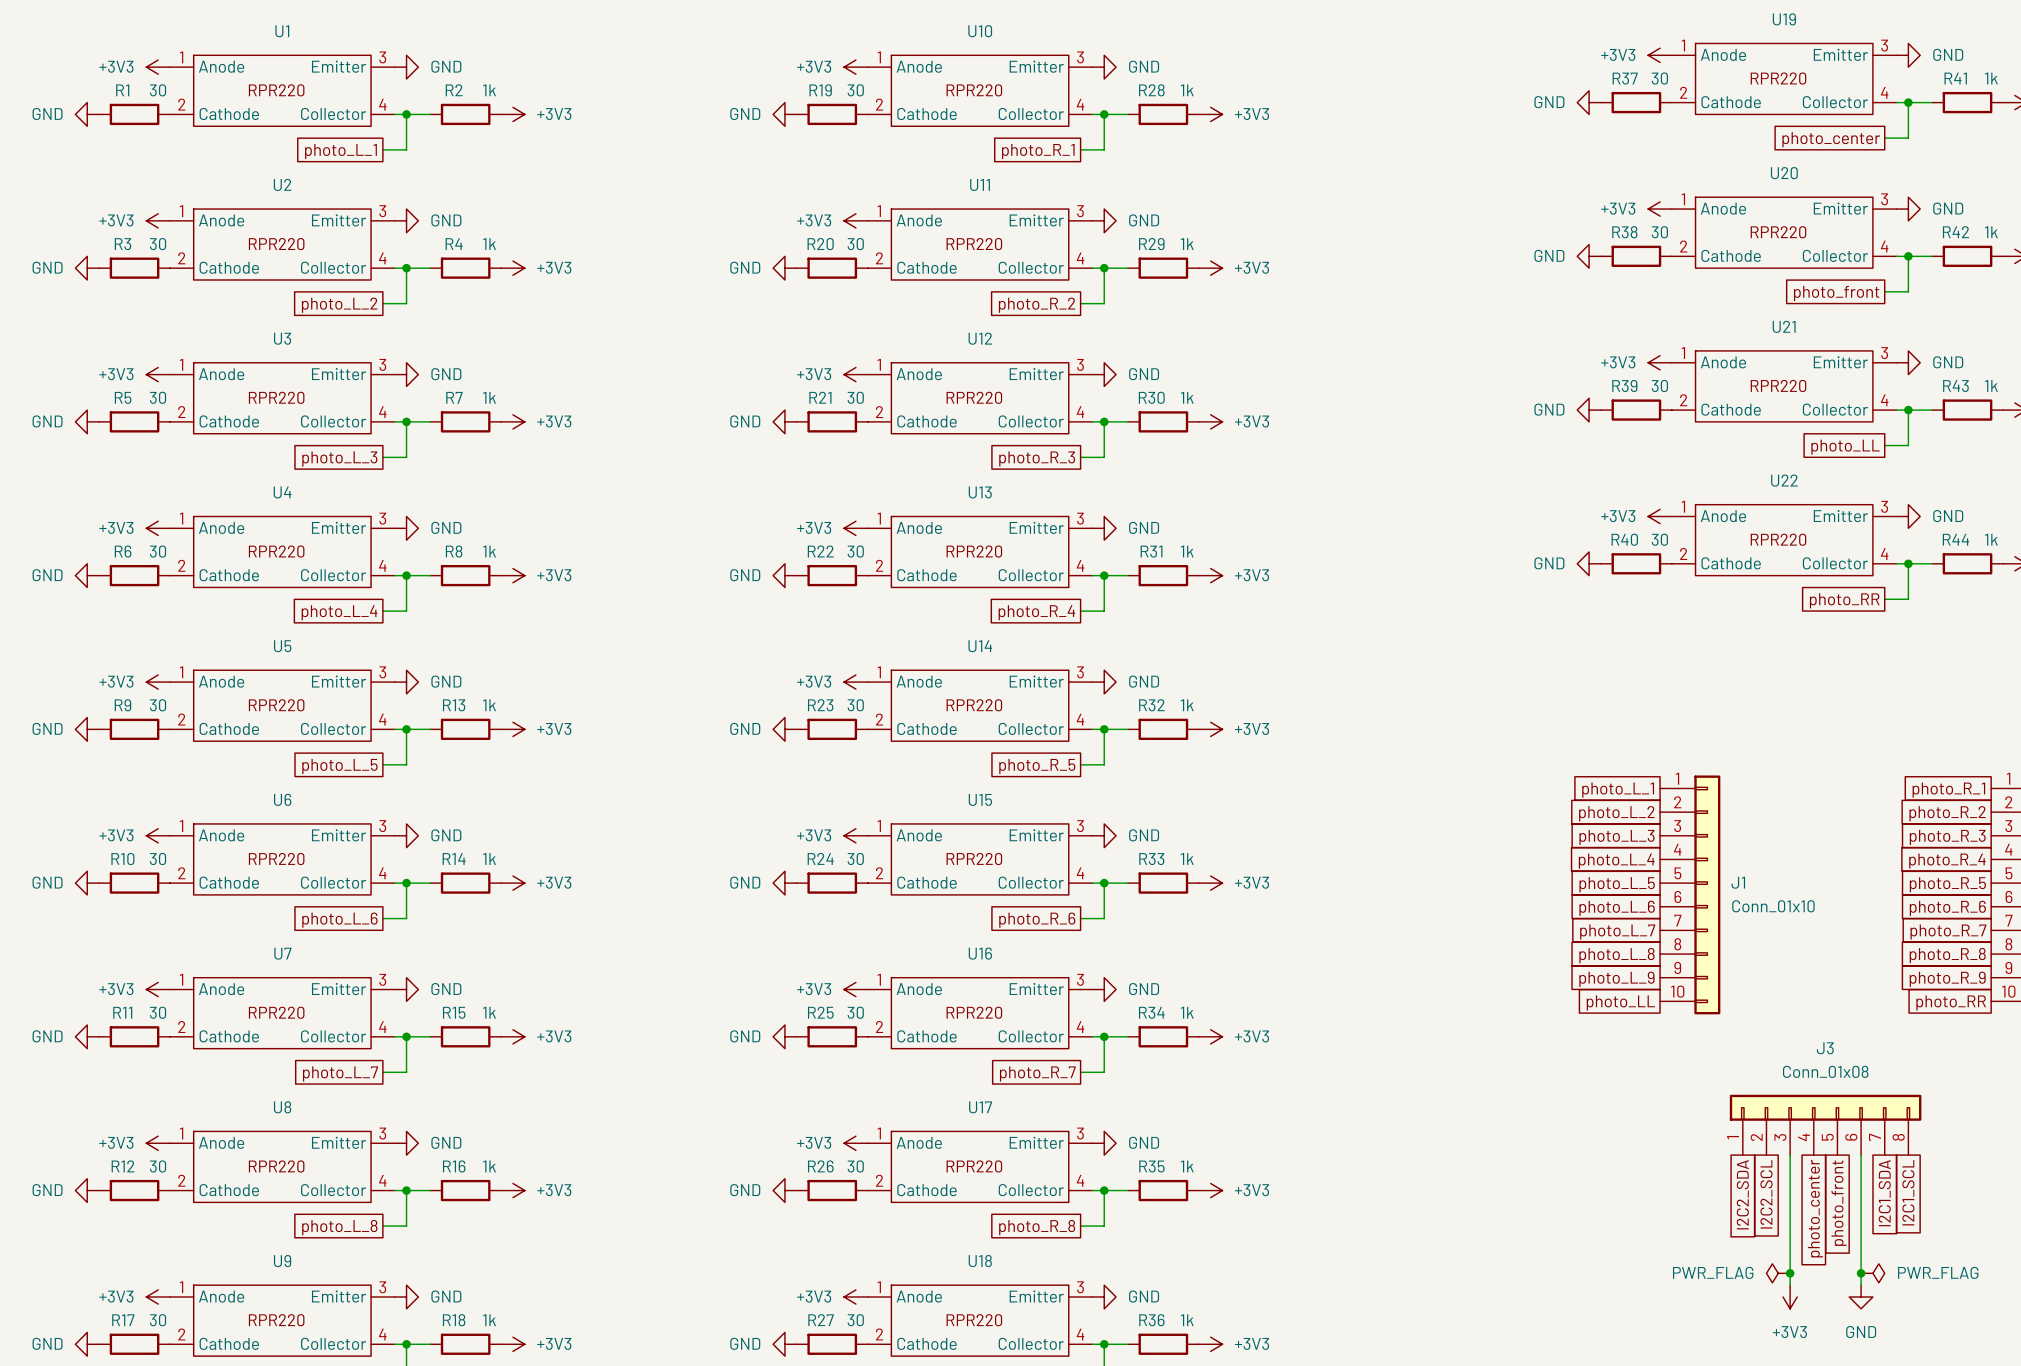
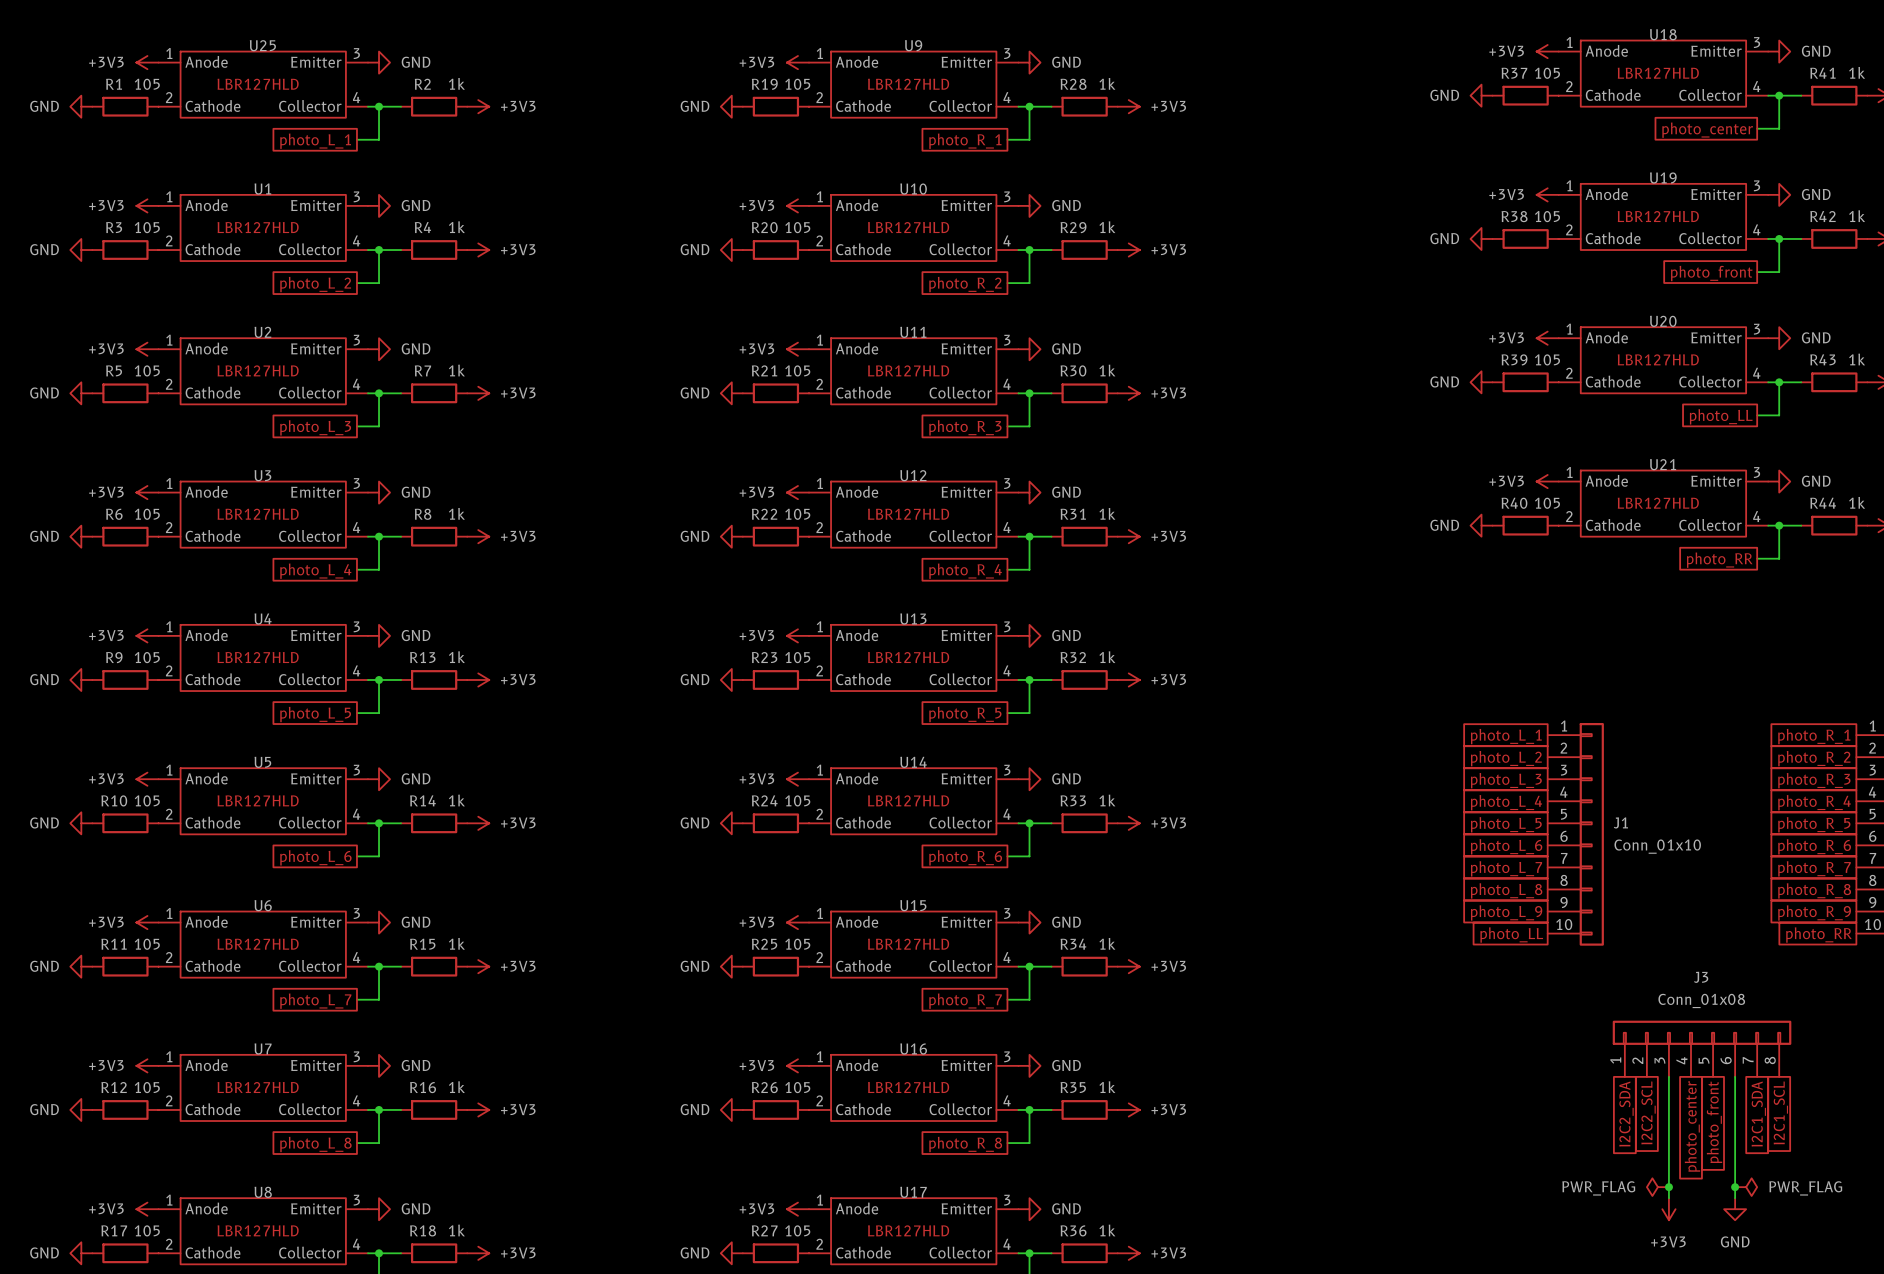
U19 name position: U19 (1784, 19) -> U19 (1663, 178)
U1 name position: U1 (282, 31) -> U1 (262, 189)
U10 name position: U10 (980, 31) -> U10 (913, 189)
R37 value: 30 (1659, 78) -> 105 (1547, 73)
U19 text: RPR220 (1778, 78) -> LBR127HLD (1658, 216)
U19 position: (1784, 78) -> (1663, 216)
R1 value: 30 (158, 90) -> 105 (147, 84)
U1 text: RPR220 (276, 90) -> LBR127HLD (258, 227)
U1 position: (282, 90) -> (263, 227)
U25: none -> (263, 84)
R19 value: 30 (855, 90) -> 105 (797, 84)
U10 text: RPR220 (974, 90) -> LBR127HLD (908, 227)
U10 position: (980, 90) -> (913, 227)
U20 name position: U20 (1784, 173) -> U20 (1663, 321)
U2 name position: U2 (282, 184) -> U2 (262, 332)
U11 name position: U11 (980, 185) -> U11 (913, 332)
R38 value: 30 (1659, 232) -> 105 (1547, 216)
U20 text: RPR220 (1778, 232) -> LBR127HLD (1658, 359)
U20 position: (1784, 232) -> (1663, 360)
R3 value: 30 (158, 244) -> 105 (147, 227)
U2 text: RPR220 (276, 244) -> LBR127HLD (258, 370)
U2 position: (282, 244) -> (263, 371)
R20 value: 30 (855, 244) -> 105 (797, 227)
U11 text: RPR220 (974, 244) -> LBR127HLD (908, 370)
U11 position: (980, 244) -> (913, 371)
U21 name position: U21 (1784, 326) -> U21 (1663, 464)
U3 name position: U3 (282, 338) -> U3 (262, 475)
U12 name position: U12 (980, 338) -> U12 (913, 475)
R39 value: 30 (1659, 385) -> 105 (1547, 359)
U21 text: RPR220 (1778, 385) -> LBR127HLD (1658, 503)
U21 position: (1784, 386) -> (1663, 503)
R5 value: 30 (158, 397) -> 105 (147, 370)
U3 text: RPR220 (276, 397) -> LBR127HLD (258, 514)
R21 value: 30 (855, 397) -> 105 (797, 370)
U12 text: RPR220 (974, 397) -> LBR127HLD (908, 514)
U3 position: (282, 398) -> (263, 514)
U12 position: (980, 398) -> (913, 514)
U4 name position: U4 (282, 492) -> U4 (263, 619)
U13 name position: U13 (980, 492) -> U13 (913, 619)
R40 value: 30 (1659, 539) -> 105 (1547, 503)
U22: (1784, 540) -> none
R6 value: 30 (158, 551) -> 105 (147, 514)
U4 text: RPR220 (276, 551) -> LBR127HLD (258, 657)
U4 position: (282, 551) -> (263, 657)
R22 value: 30 (855, 551) -> 105 (797, 514)
U13 text: RPR220 (974, 551) -> LBR127HLD (908, 657)
U13 position: (980, 551) -> (913, 657)
U5 name position: U5 (282, 646) -> U5 (262, 762)
U14 name position: U14 (980, 646) -> U14 (913, 762)
R9 value: 30 (158, 705) -> 105 (147, 657)
U5 text: RPR220 (276, 705) -> LBR127HLD (258, 800)
U5 position: (282, 705) -> (263, 801)
R23 value: 30 (855, 705) -> 105 (797, 657)
U14 text: RPR220 (974, 705) -> LBR127HLD (908, 800)
U14 position: (980, 705) -> (913, 801)
U6 name position: U6 (282, 799) -> U6 (263, 905)
U15 name position: U15 (980, 799) -> U15 (913, 905)
R10 value: 30 (158, 859) -> 105 (147, 800)
U6 text: RPR220 (276, 859) -> LBR127HLD (258, 944)
U6 position: (282, 859) -> (263, 944)
R24 value: 30 (855, 859) -> 105 (797, 800)
U15 text: RPR220 (974, 859) -> LBR127HLD (908, 944)
U15 position: (980, 859) -> (913, 944)
U7 name position: U7 (282, 953) -> U7 (263, 1048)
U16 name position: U16 (980, 953) -> U16 (913, 1048)
R11 value: 30 (158, 1012) -> 105 (147, 944)
U7 text: RPR220 (276, 1012) -> LBR127HLD (258, 1087)
R25 value: 30 (855, 1012) -> 105 (797, 944)
U16 text: RPR220 (974, 1012) -> LBR127HLD (908, 1087)
U7 position: (282, 1013) -> (263, 1087)
U16 position: (980, 1013) -> (913, 1087)
U8 name position: U8 (282, 1107) -> U8 (263, 1192)
U17 name position: U17 (980, 1107) -> U17 (913, 1192)
R12 value: 30 (158, 1166) -> 105 (147, 1087)
U8 text: RPR220 (276, 1166) -> LBR127HLD (258, 1230)
U8 position: (282, 1166) -> (263, 1231)
R26 value: 30 (855, 1166) -> 105 (797, 1087)
U17 text: RPR220 (974, 1166) -> LBR127HLD (908, 1230)
U17 position: (980, 1166) -> (913, 1231)
U9 name position: U9 (282, 1261) -> U9 (913, 45)
U18 name position: U18 (980, 1261) -> U18 (1663, 34)
R17 value: 30 (158, 1320) -> 105 (147, 1230)
U9 text: RPR220 (276, 1320) -> LBR127HLD (908, 84)
U9 position: (282, 1320) -> (913, 84)
R27 value: 30 (855, 1320) -> 105 (797, 1230)
U18 text: RPR220 (974, 1320) -> LBR127HLD (1658, 73)
U18 position: (980, 1320) -> (1663, 73)

